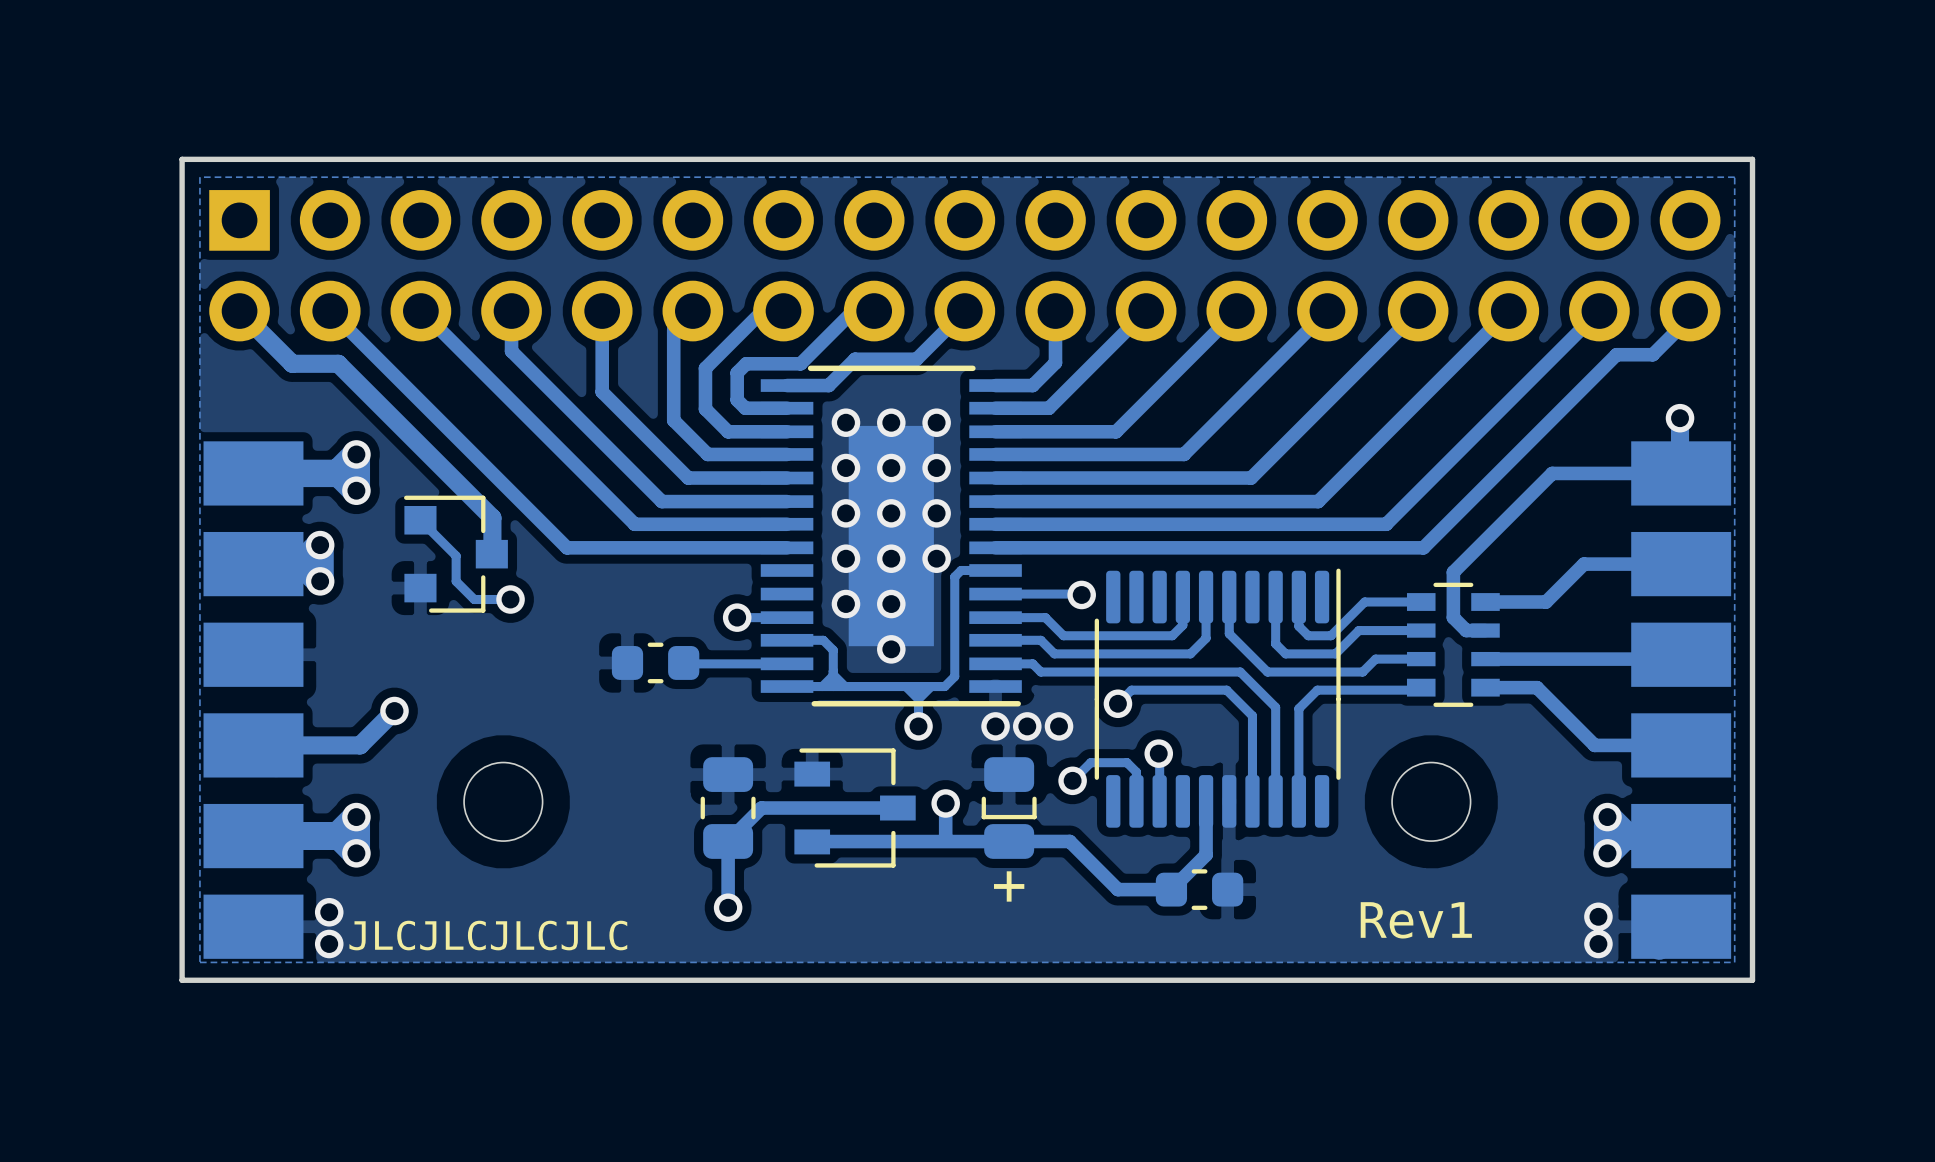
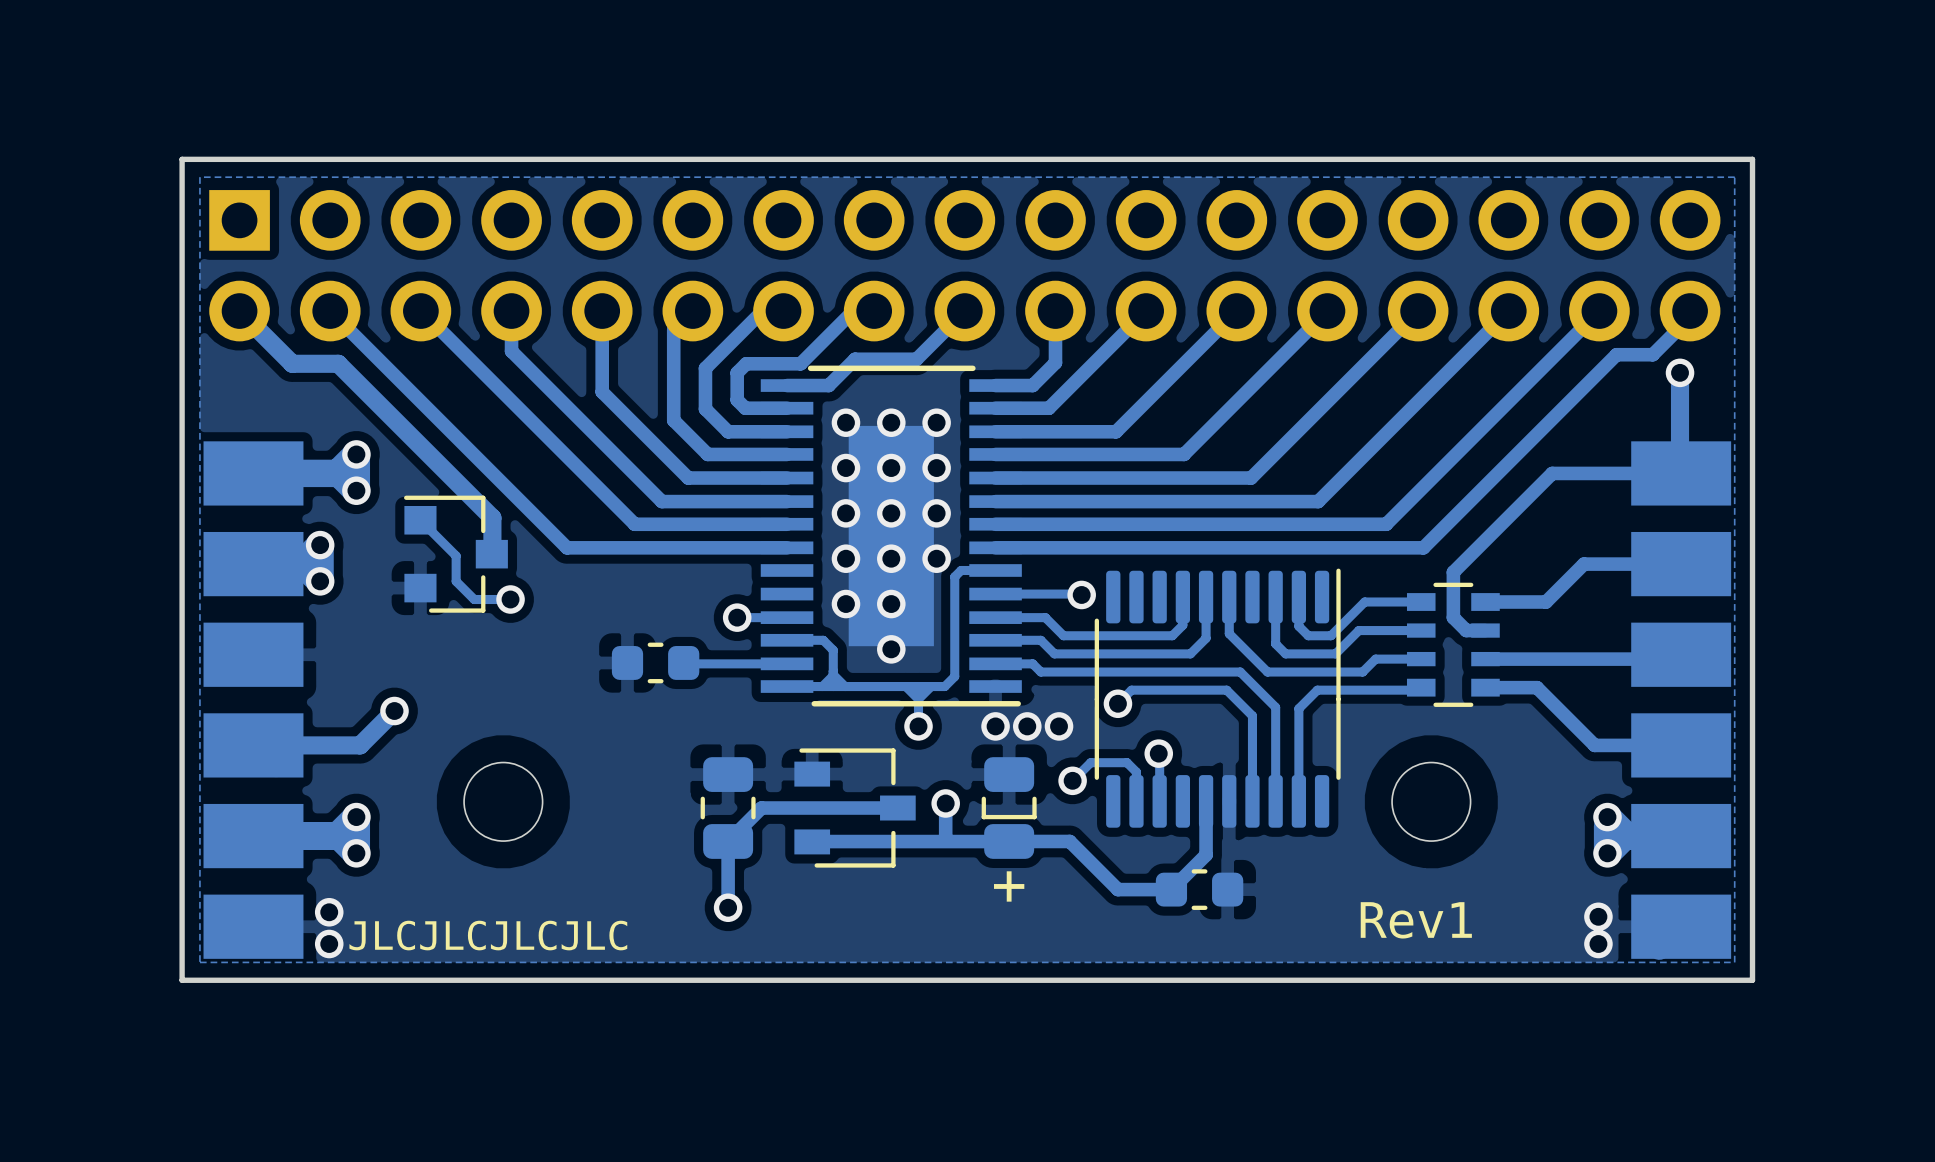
track: none -> (1680, 372) (1680, 418)
via position: (1680, 418) -> (1680, 372)

